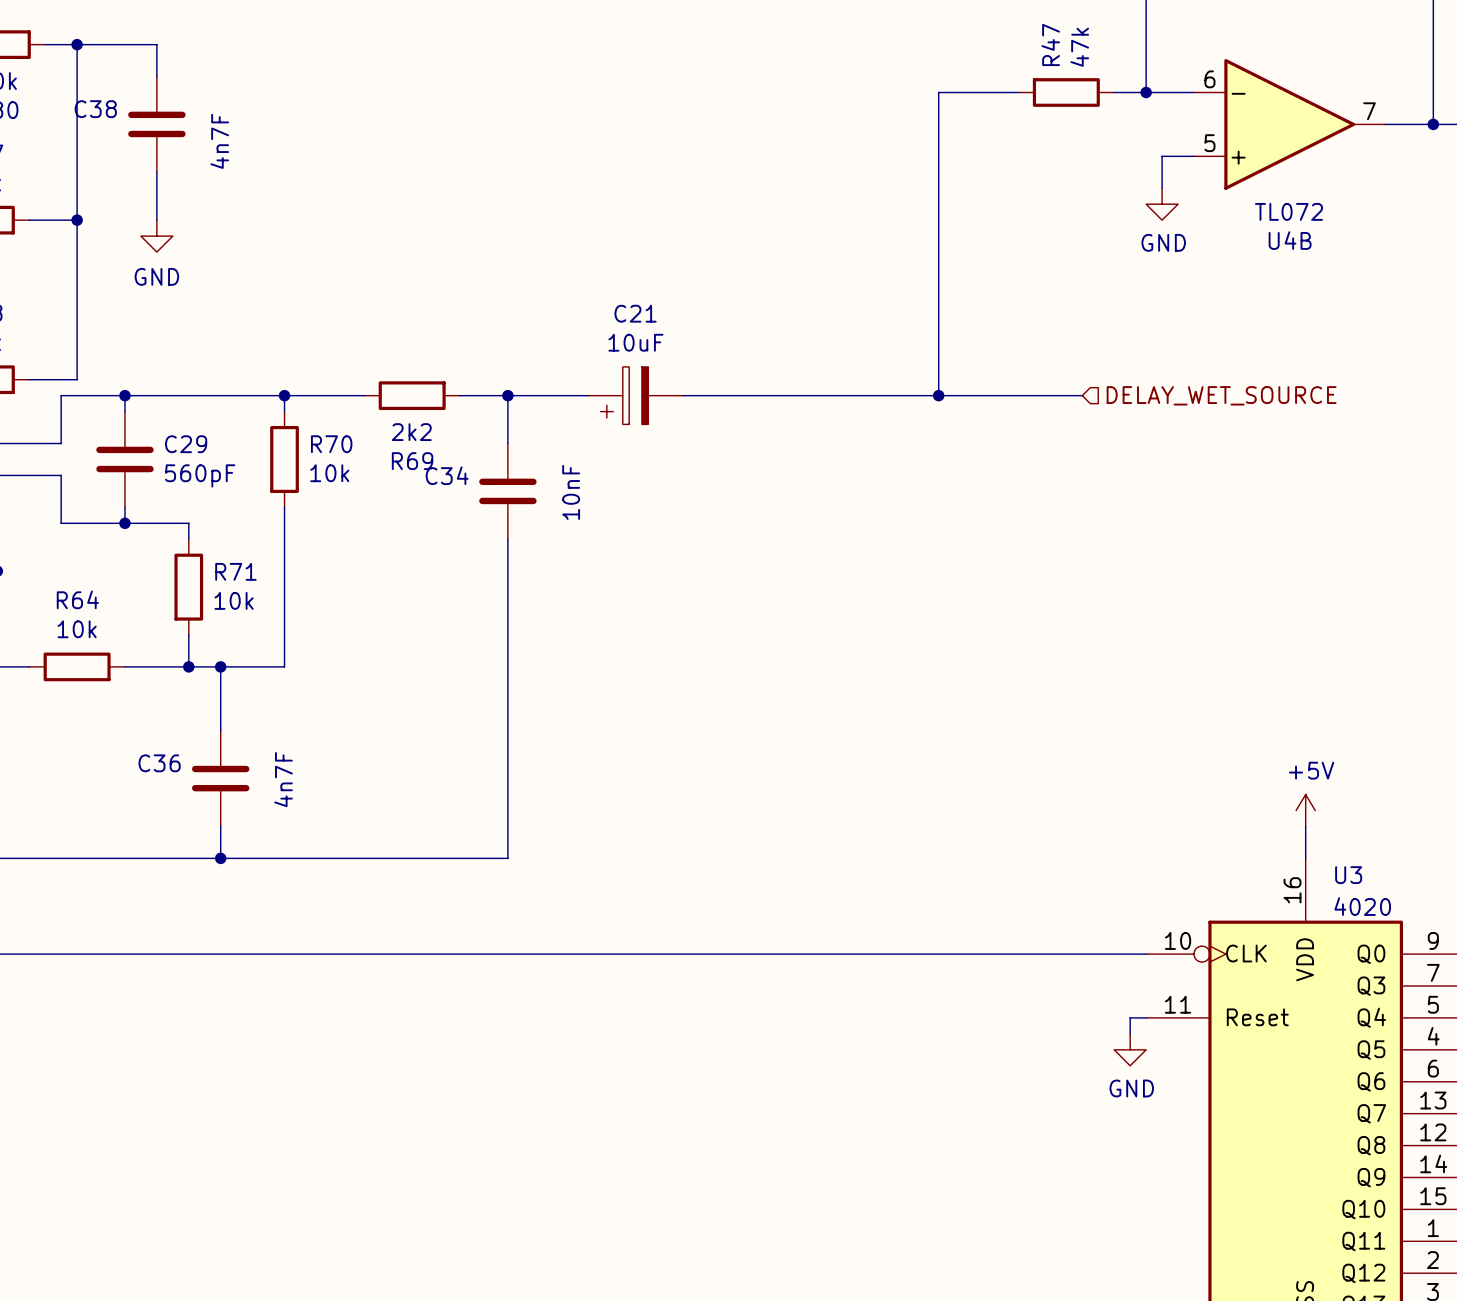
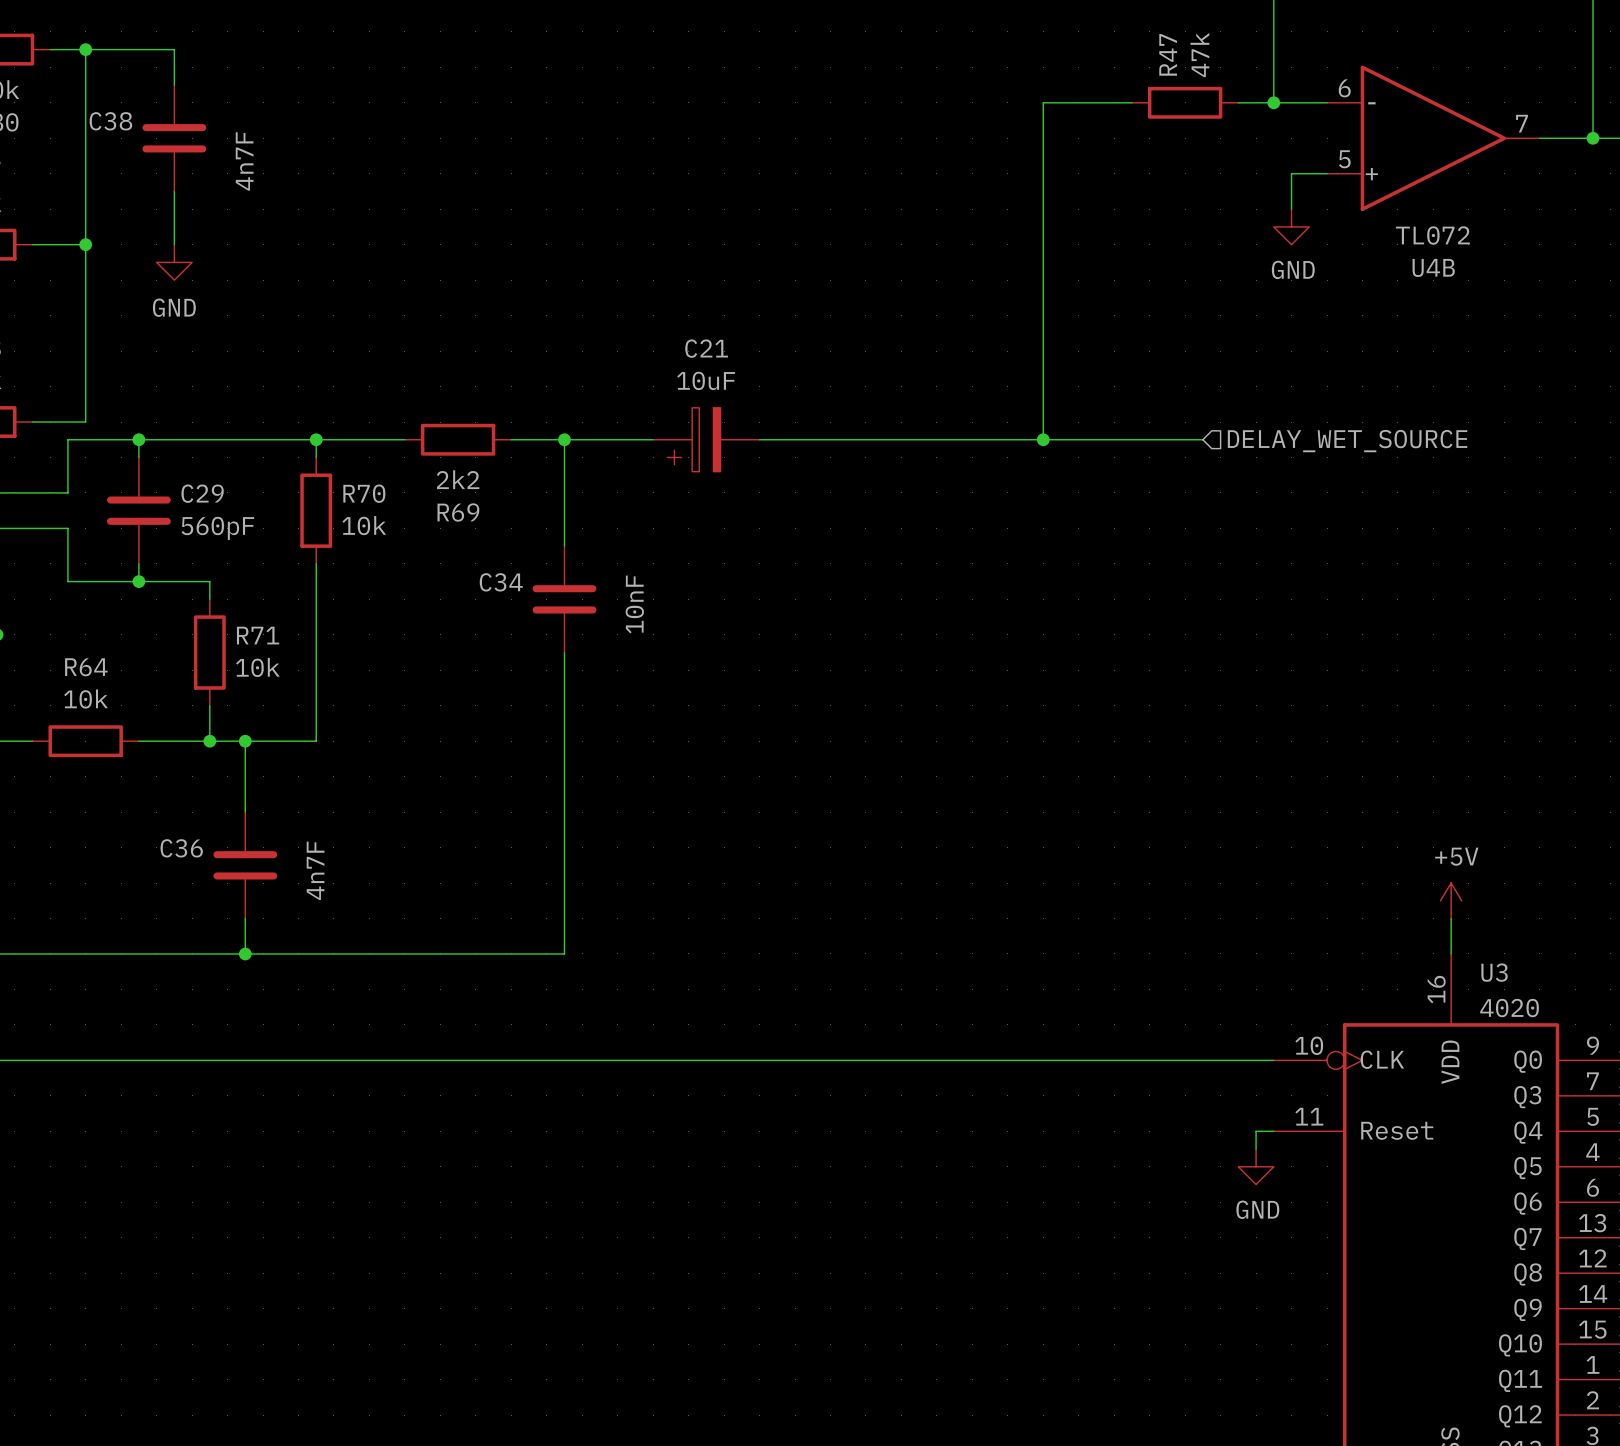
C34 position: (507, 491) -> (564, 599)

